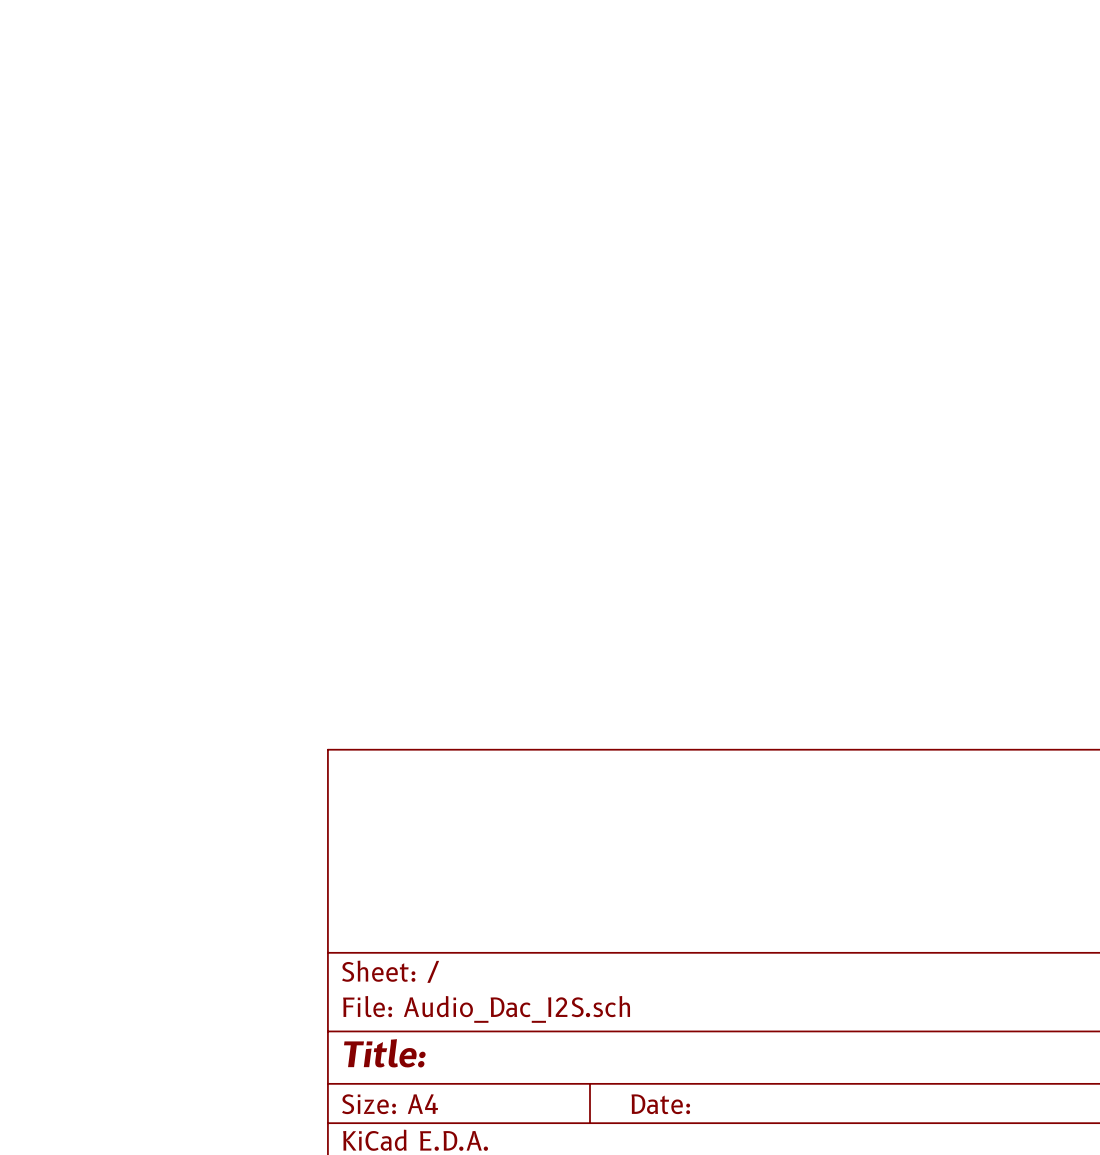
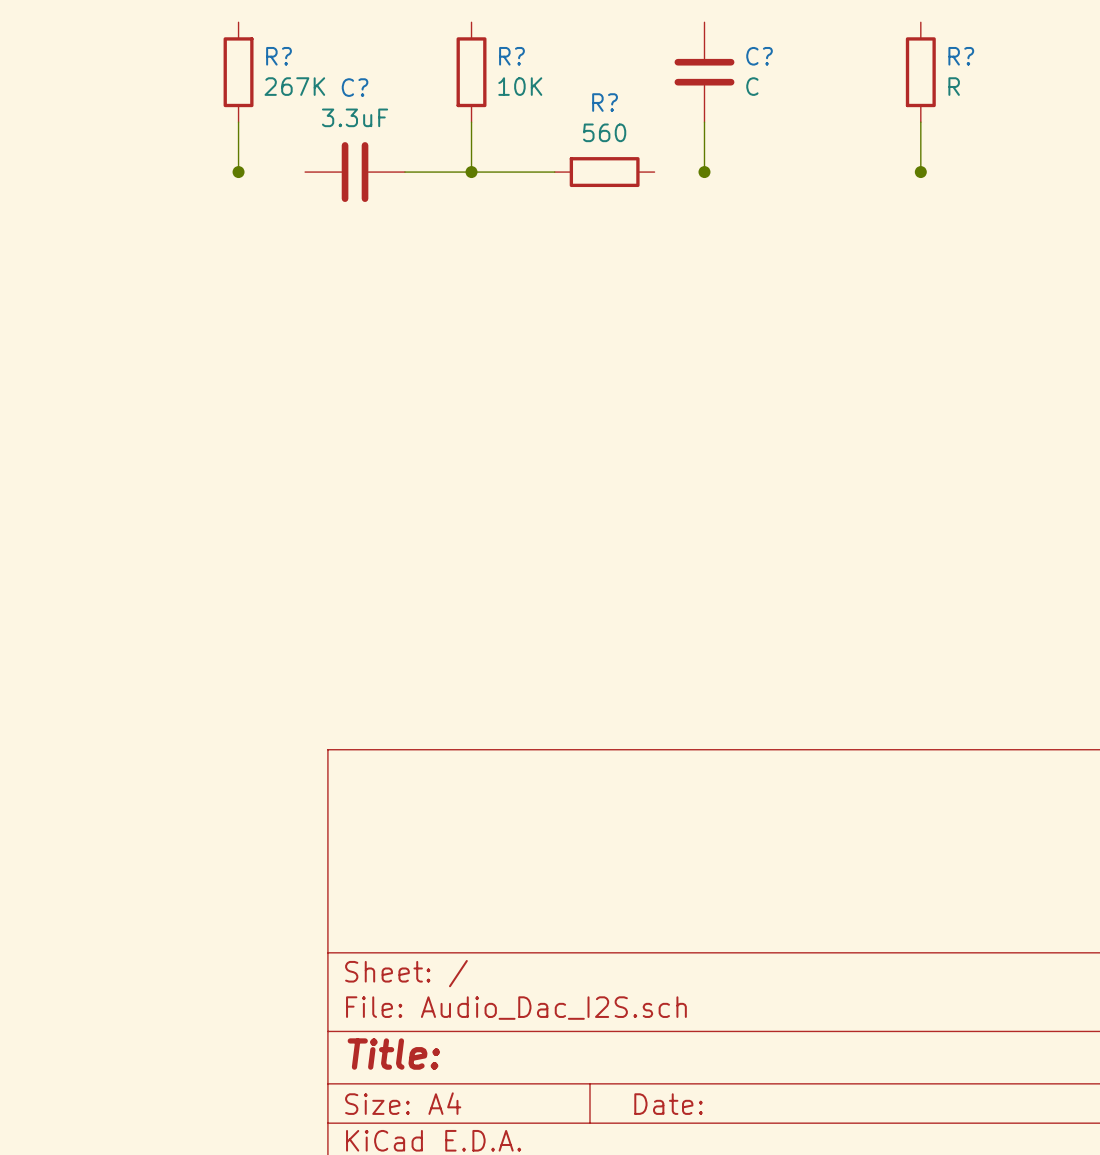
R?: none -> 267K (238, 72)
R?: none -> 10K (471, 72)
C?: none -> C (704, 72)
R?: none -> R (920, 72)
wire: none -> (238, 122) (238, 172)
wire: none -> (471, 122) (471, 172)
wire: none -> (704, 122) (704, 172)
wire: none -> (920, 122) (920, 172)
junction: none -> (238, 172)
C?: none -> 3.3uF (355, 172)
wire: none -> (404, 172) (554, 172)
junction: none -> (471, 172)
R?: none -> 560 (604, 172)
junction: none -> (704, 172)
junction: none -> (920, 172)

